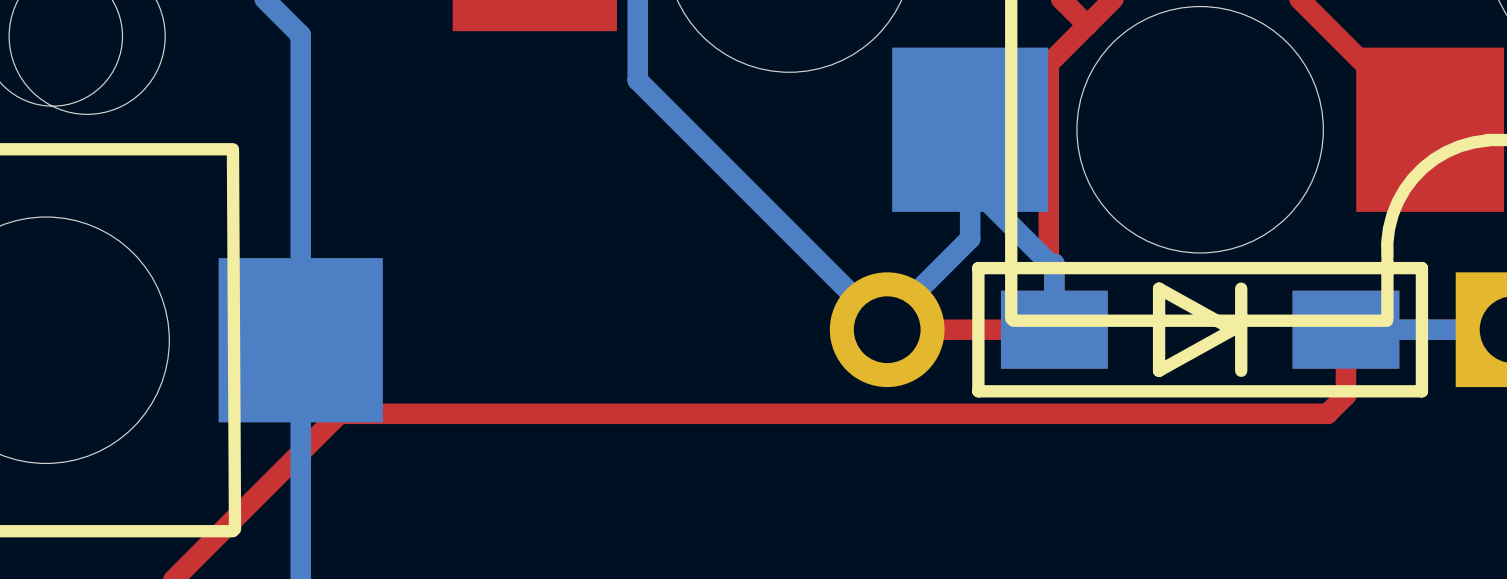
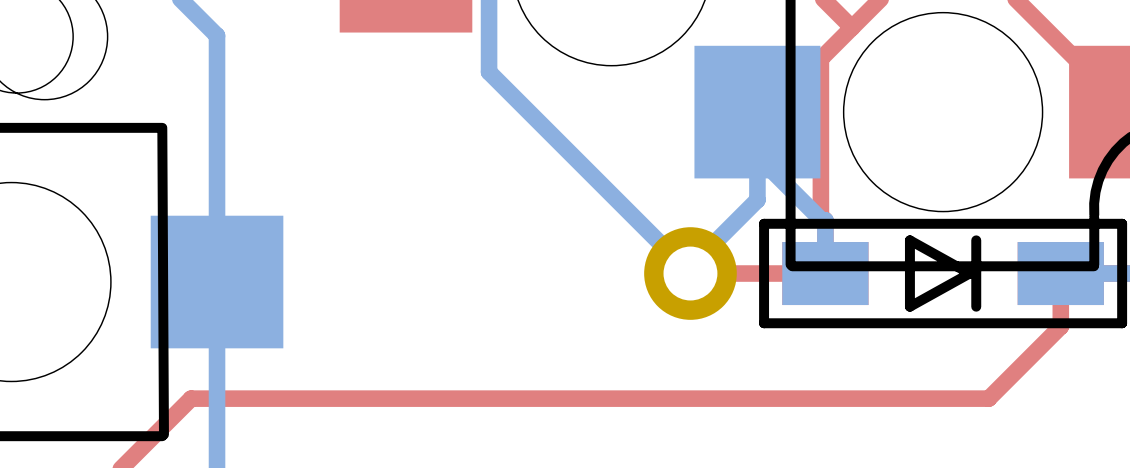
top track: (1327, 413) (339, 413) (268, 484) -> (1045, 341) (988, 398) (191, 398)

